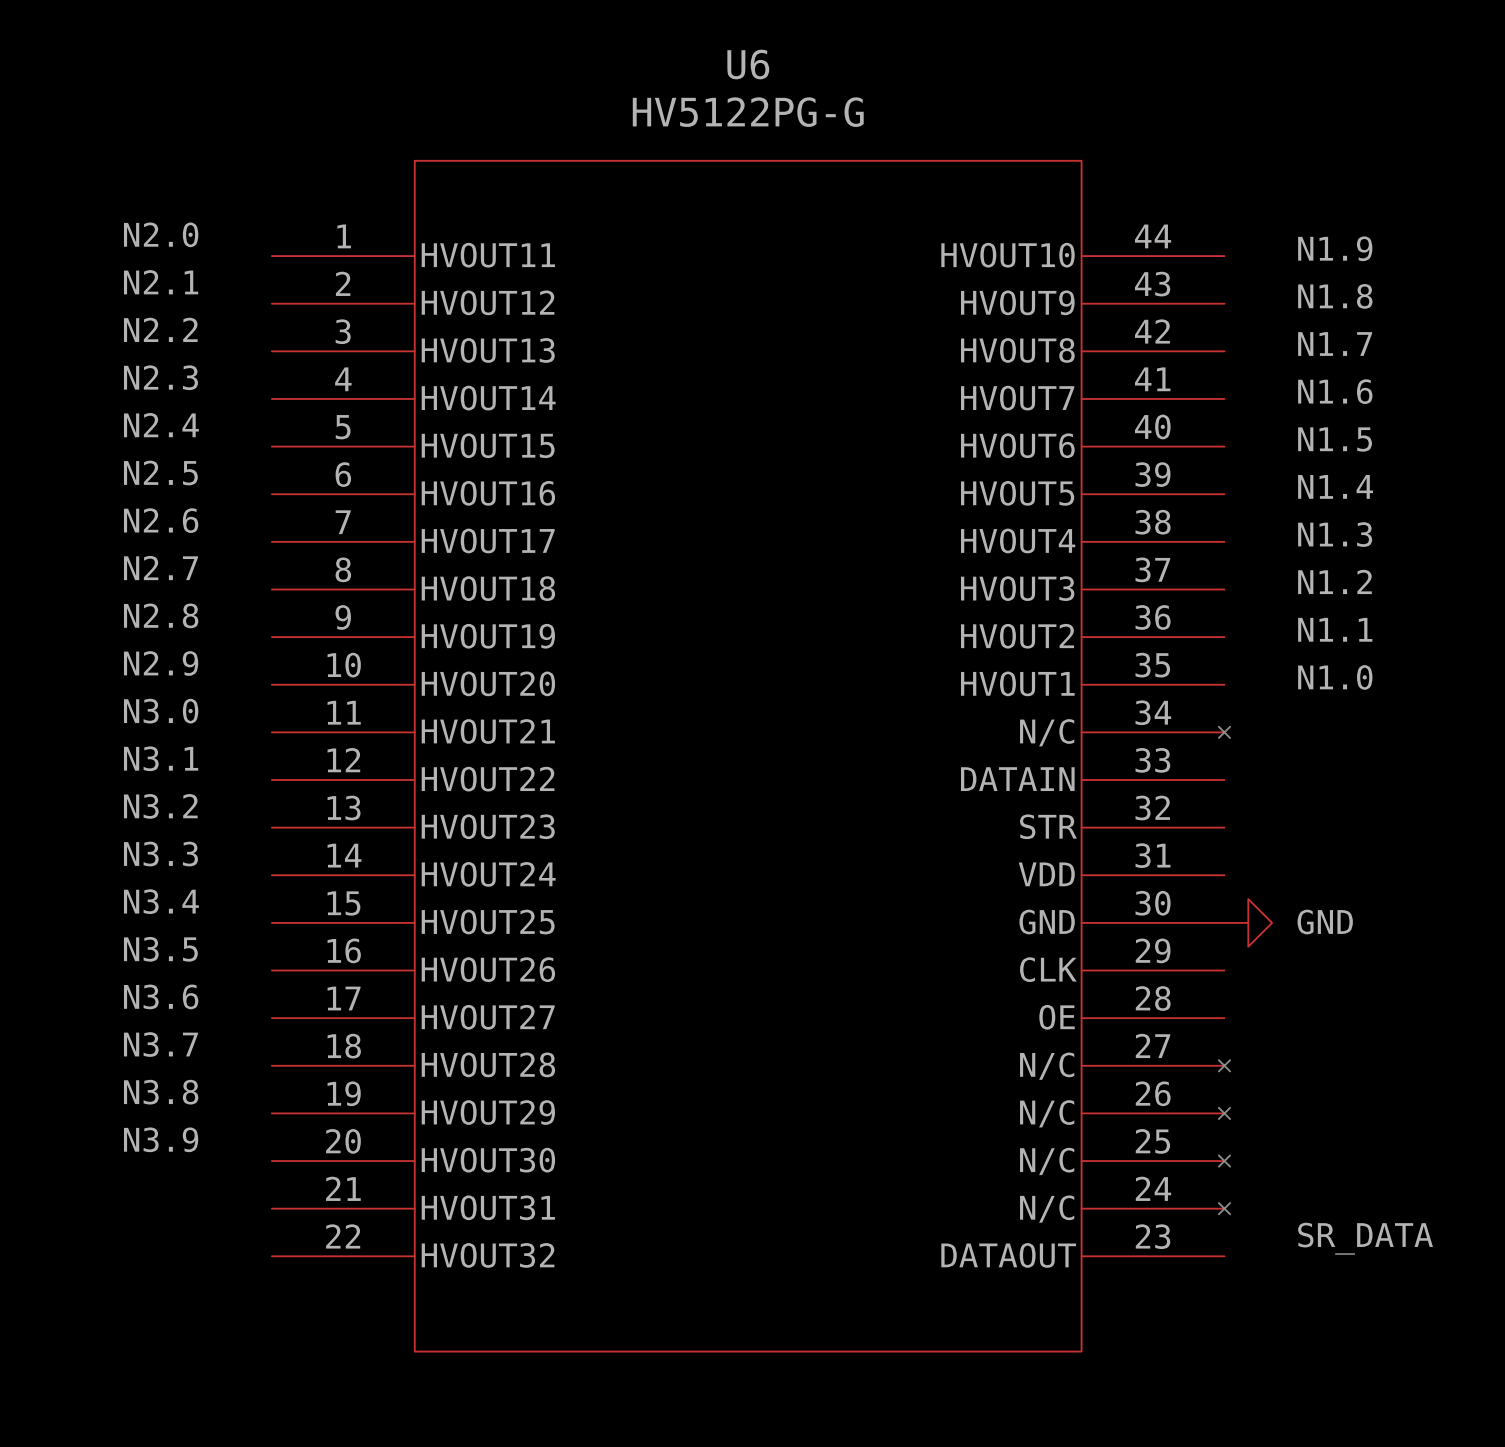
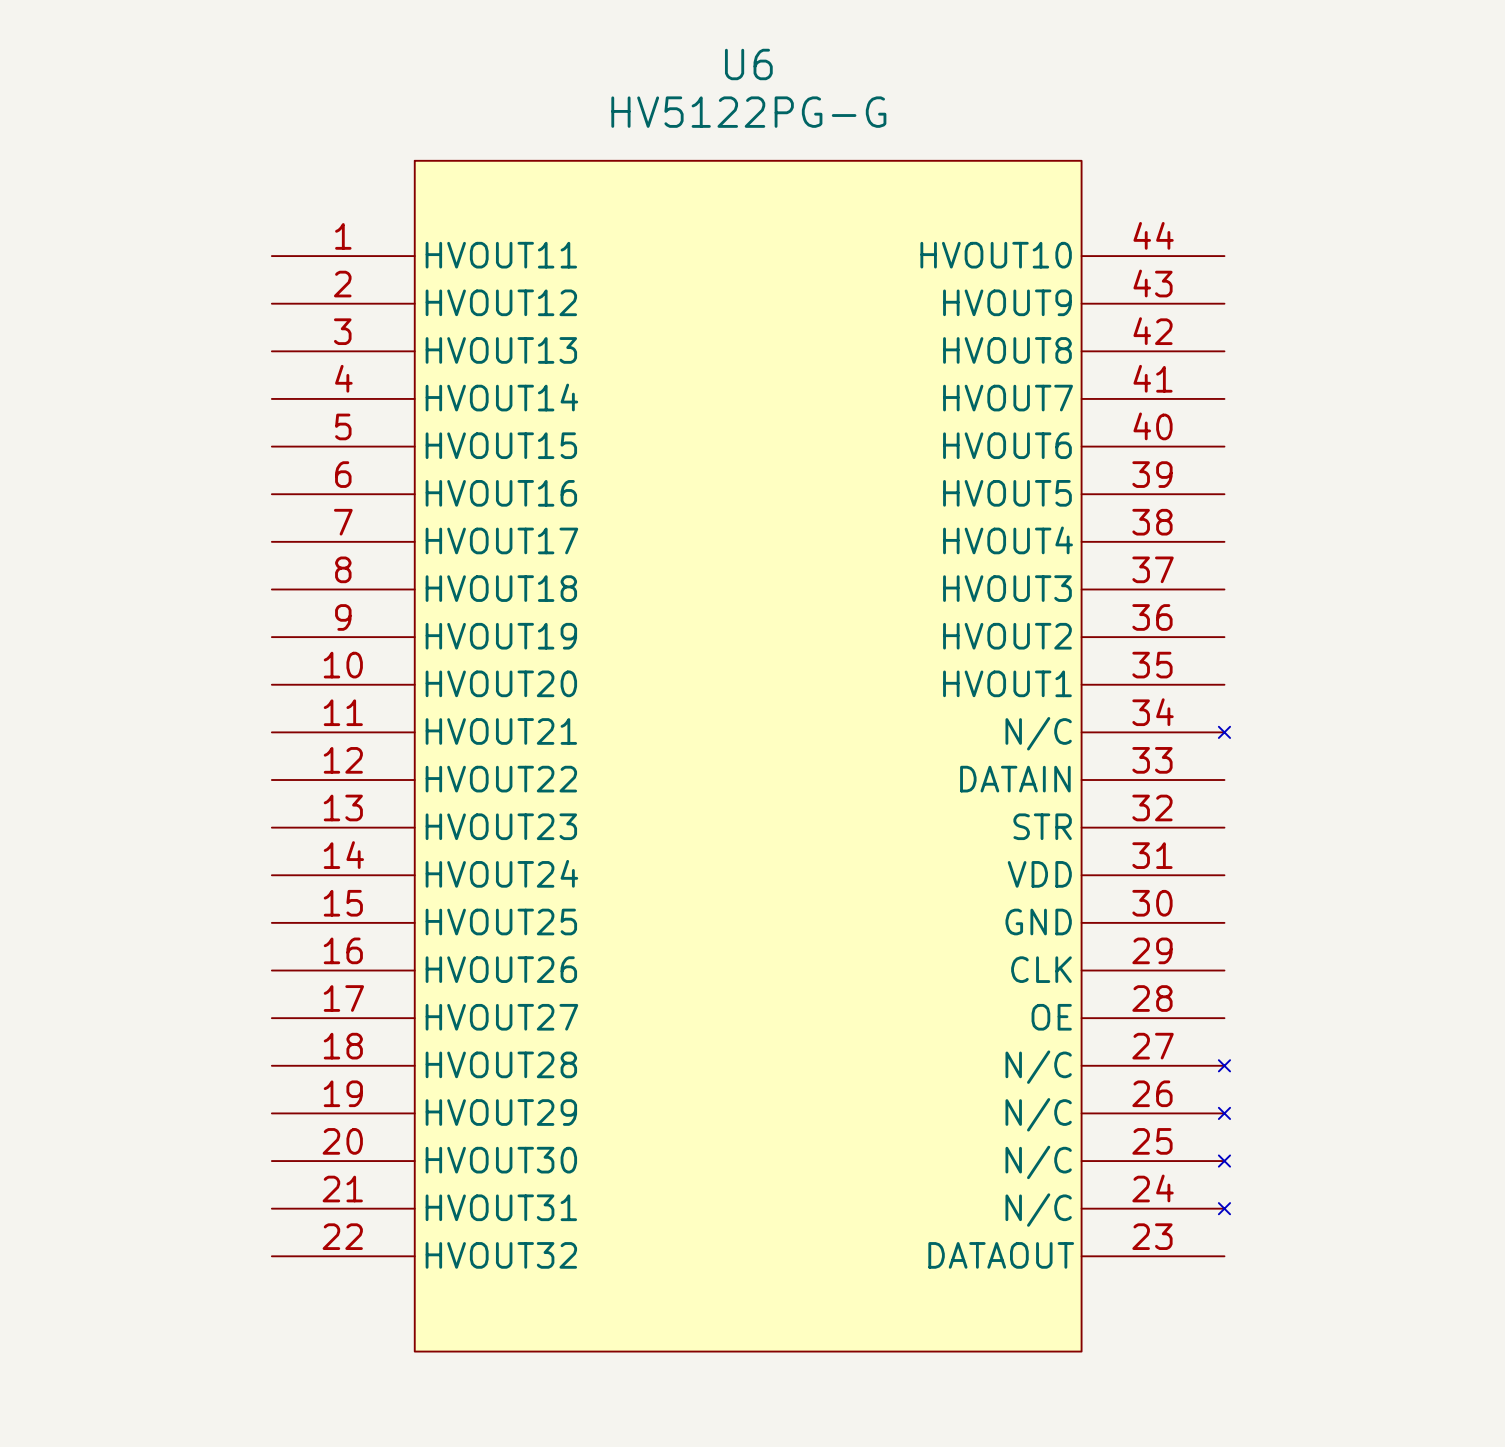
label: N2.0 (161, 234) -> none
label: N1.9 (1335, 248) -> none
label: N2.1 (161, 282) -> none
label: N1.8 (1335, 296) -> none
label: N2.2 (160, 329) -> none
label: N1.7 (1335, 344) -> none
label: N2.3 (160, 377) -> none
label: N1.6 (1335, 391) -> none
label: N2.4 (161, 425) -> none
label: N1.5 (1335, 439) -> none
label: N2.5 (160, 472) -> none
label: N1.4 (1335, 486) -> none
label: N2.6 (161, 520) -> none
label: N1.3 (1335, 534) -> none
label: N2.7 (160, 568) -> none
label: N1.2 (1334, 581) -> none
label: N2.8 (161, 615) -> none
label: N1.1 (1335, 629) -> none
label: N2.9 (161, 663) -> none
label: N1.0 (1335, 677) -> none
label: N3.0 (161, 711) -> none
label: N3.1 (161, 758) -> none
label: N3.2 (160, 806) -> none
label: N3.3 (160, 854) -> none
label: N3.4 (161, 901) -> none
power symbol: GND (1248, 922) -> none
label: N3.5 (160, 949) -> none
label: N3.6 (161, 996) -> none
label: N3.7 (160, 1044) -> none
label: N3.8 (161, 1092) -> none
label: N3.9 (161, 1139) -> none
label: SR_DATA (1365, 1238) -> none

